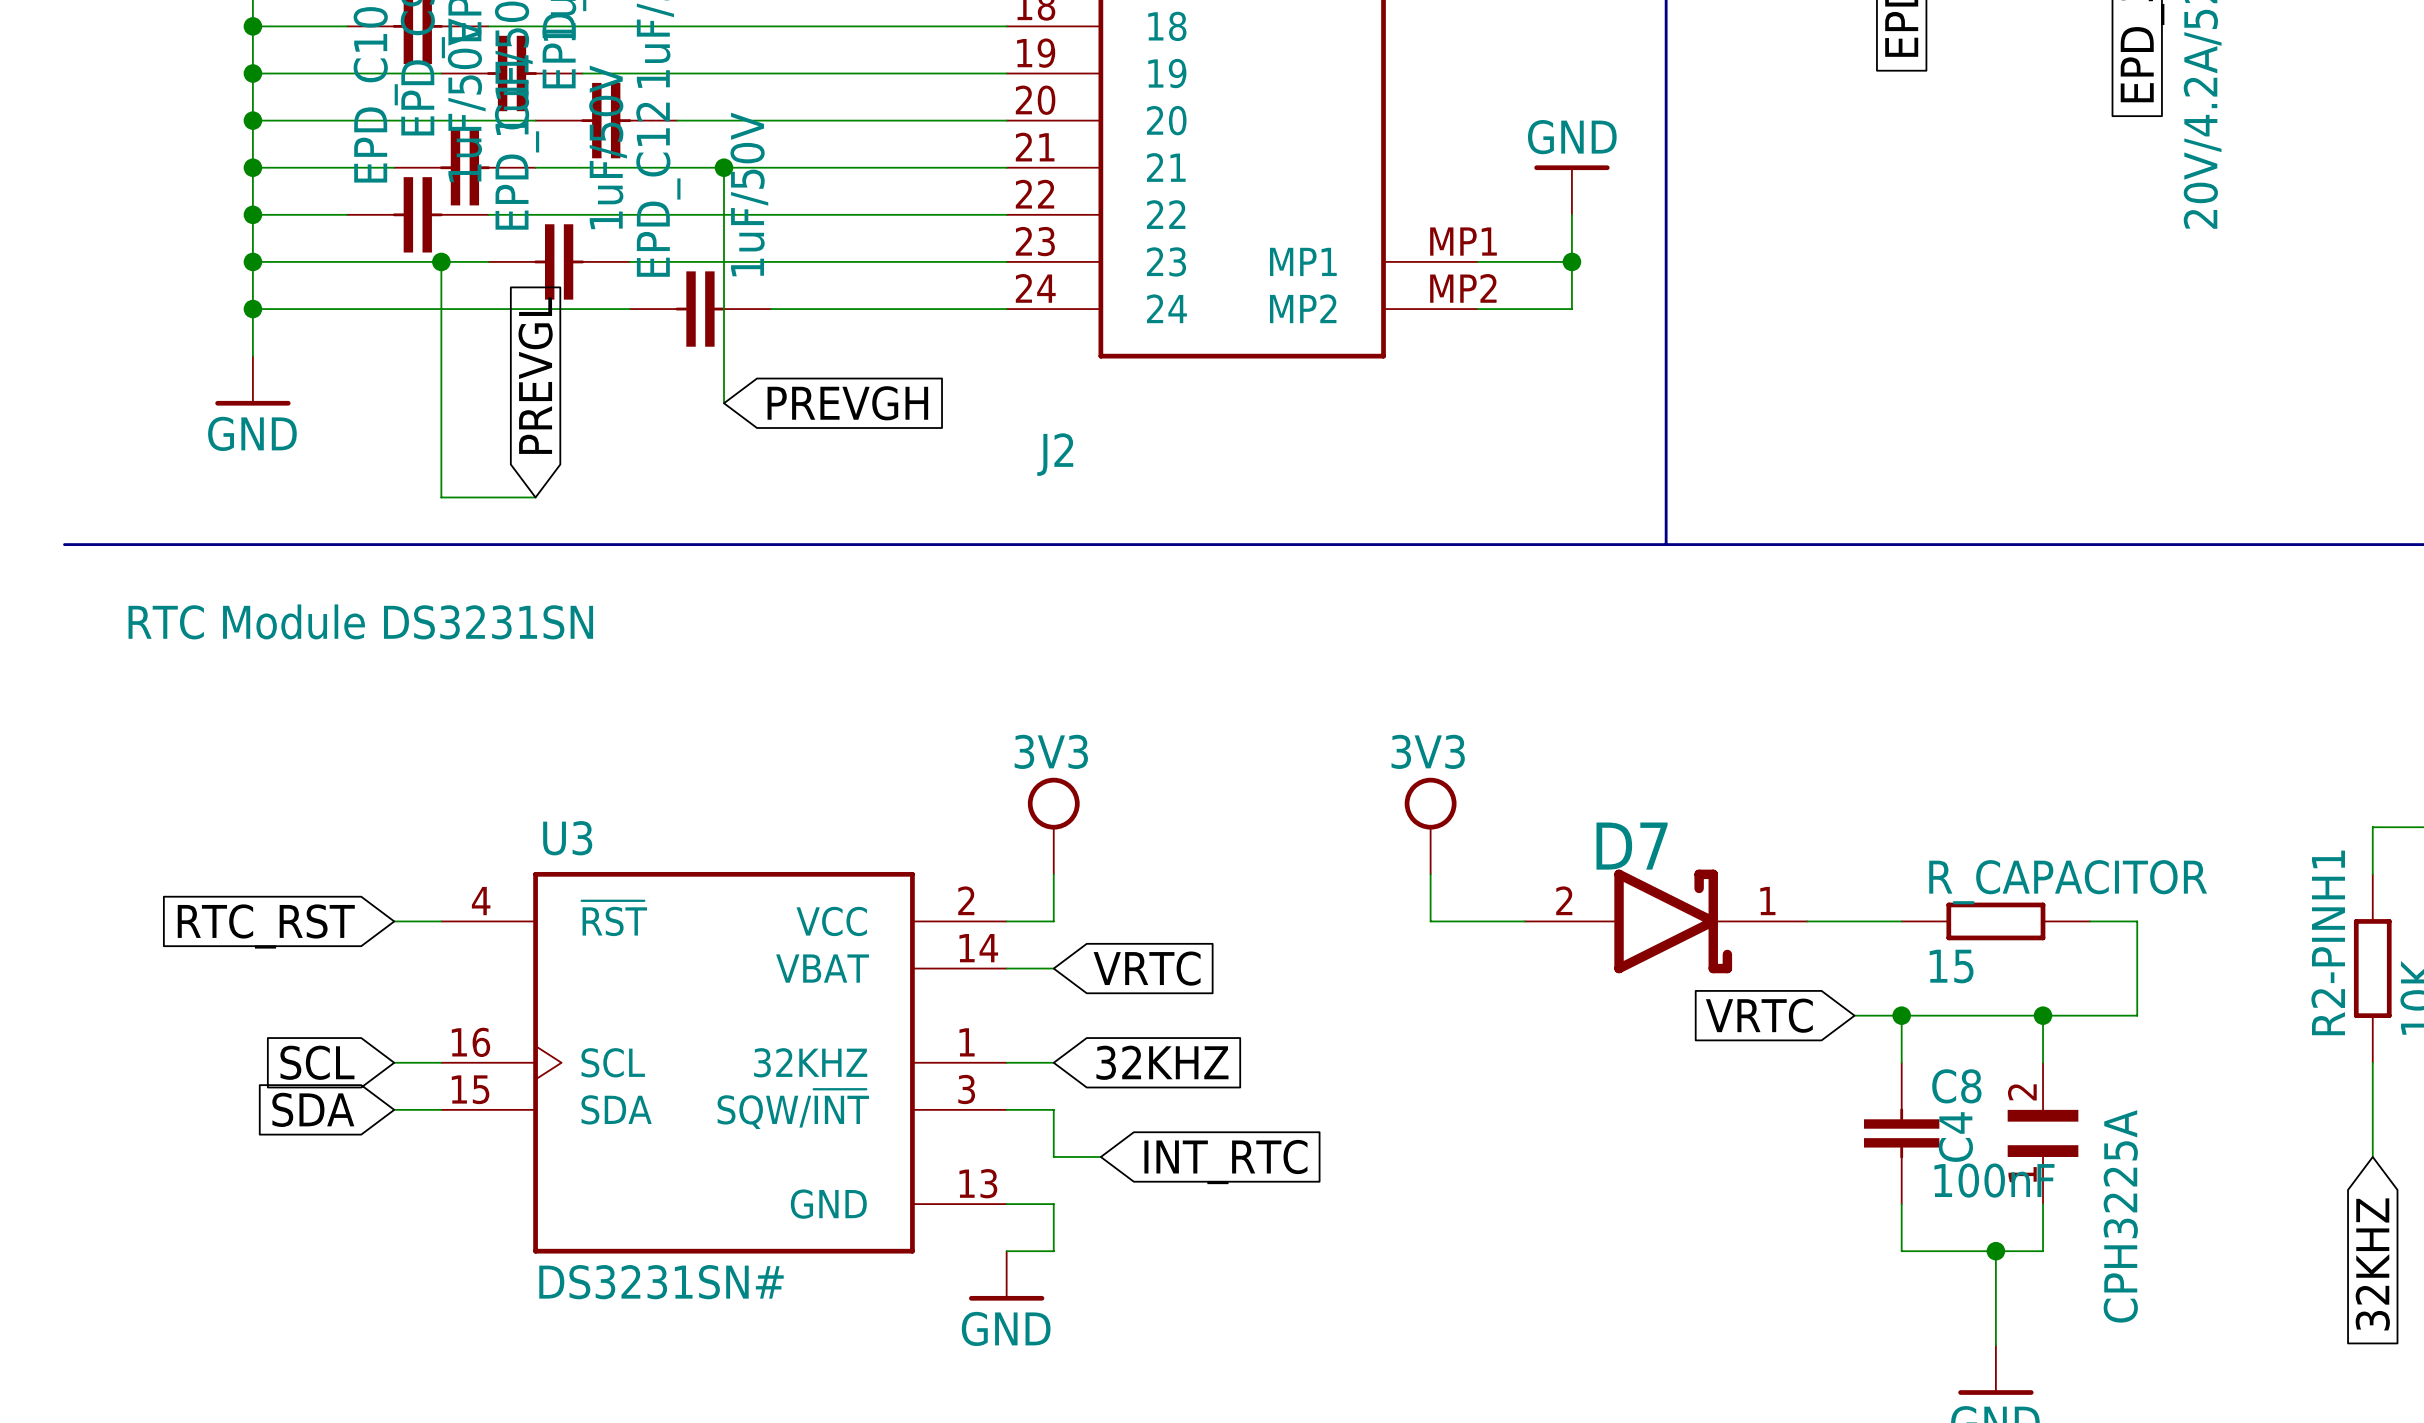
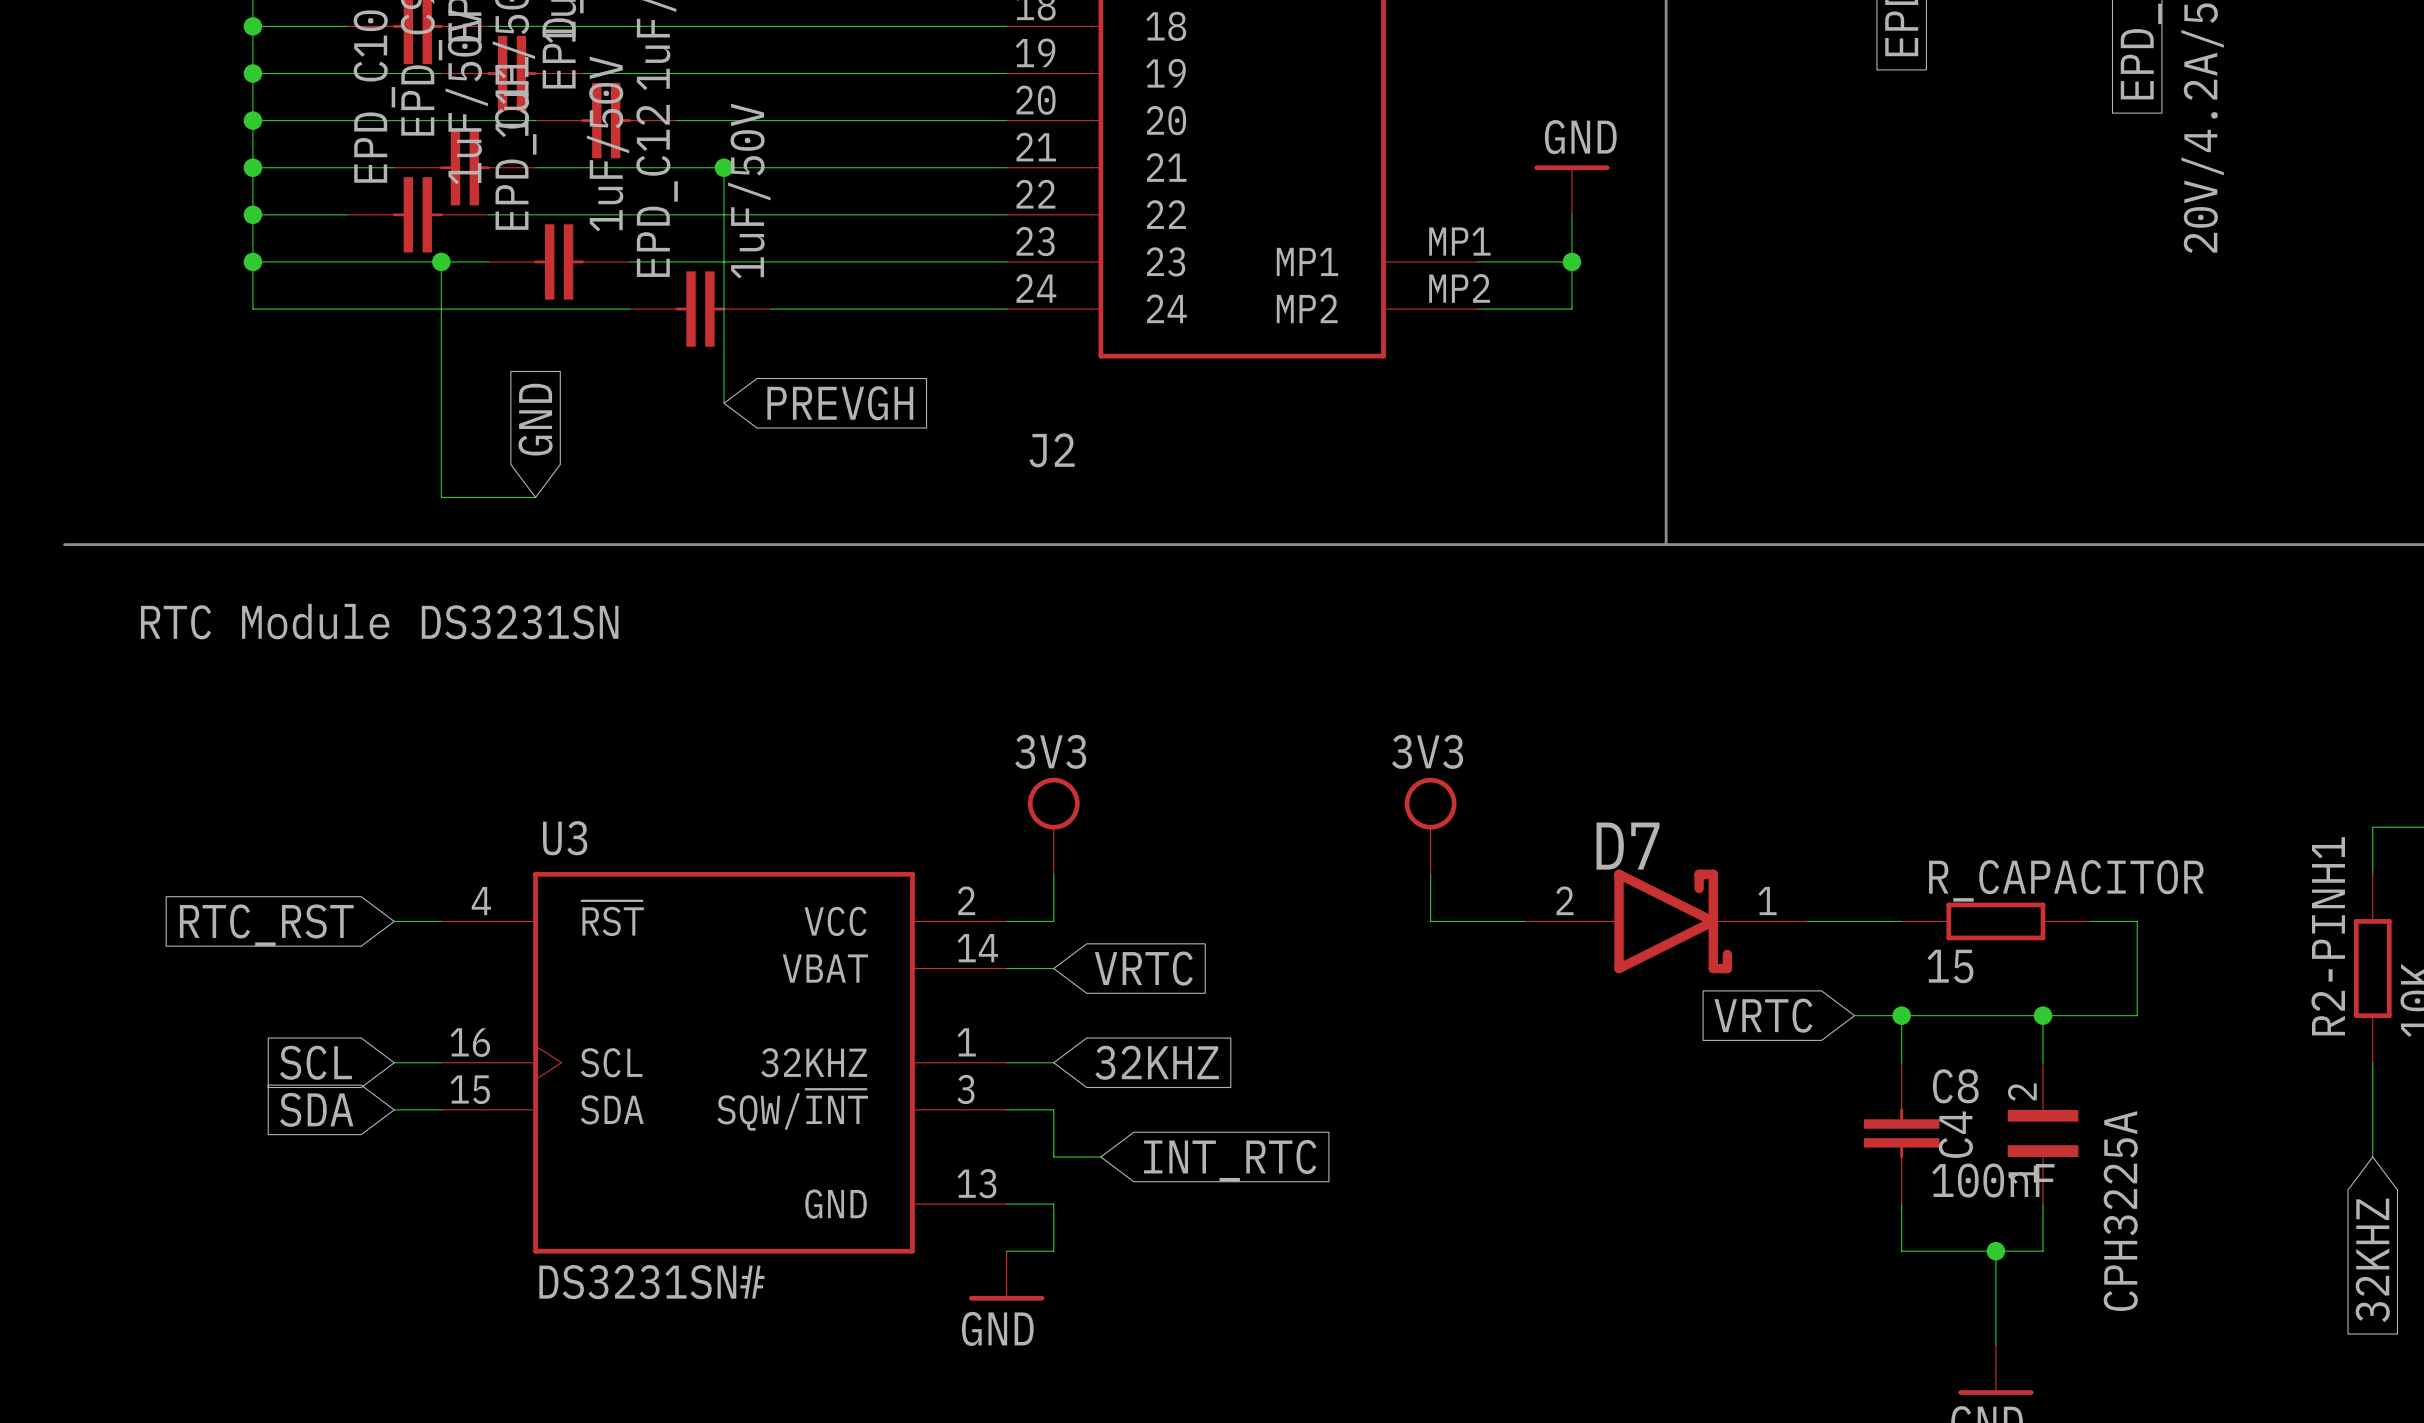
wire: (252, 309) (252, 356) -> none
junction: (252, 309) -> none
global label: PREVGL (535, 375) -> GND (535, 419)
power symbol: GND (252, 380) -> none

